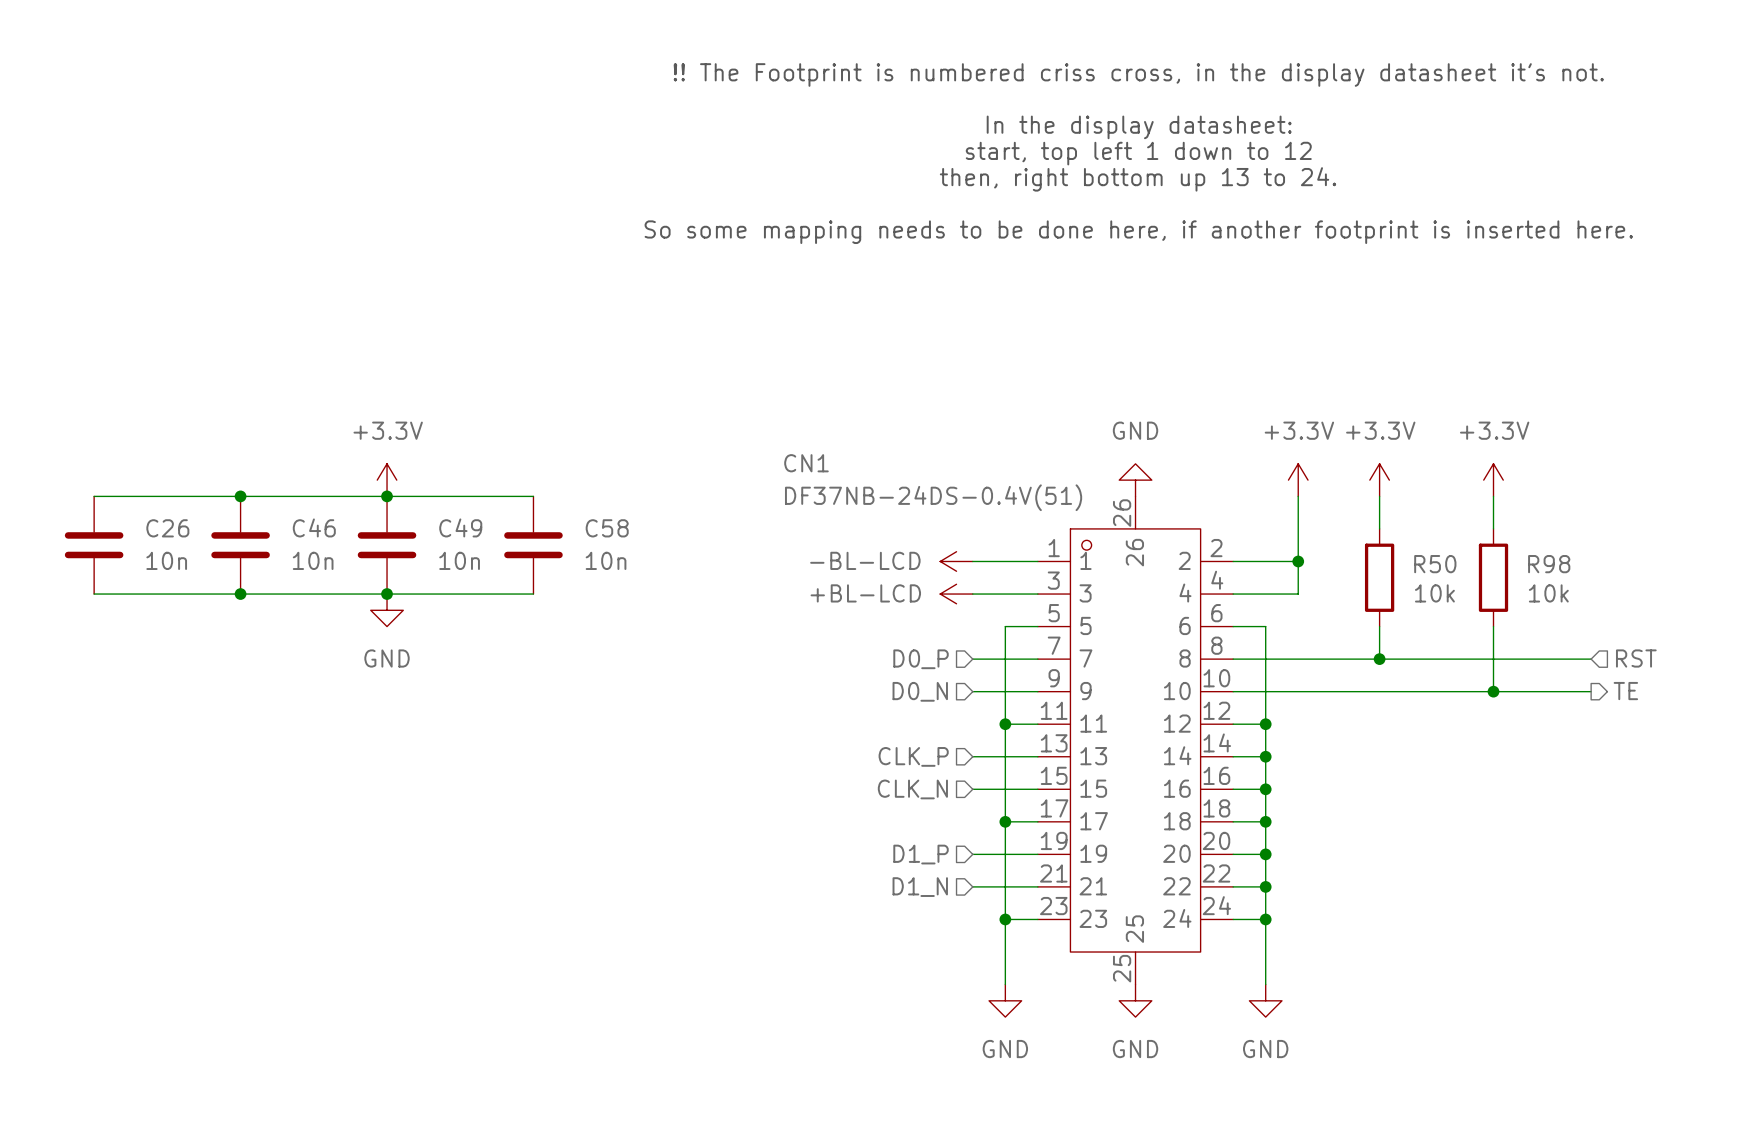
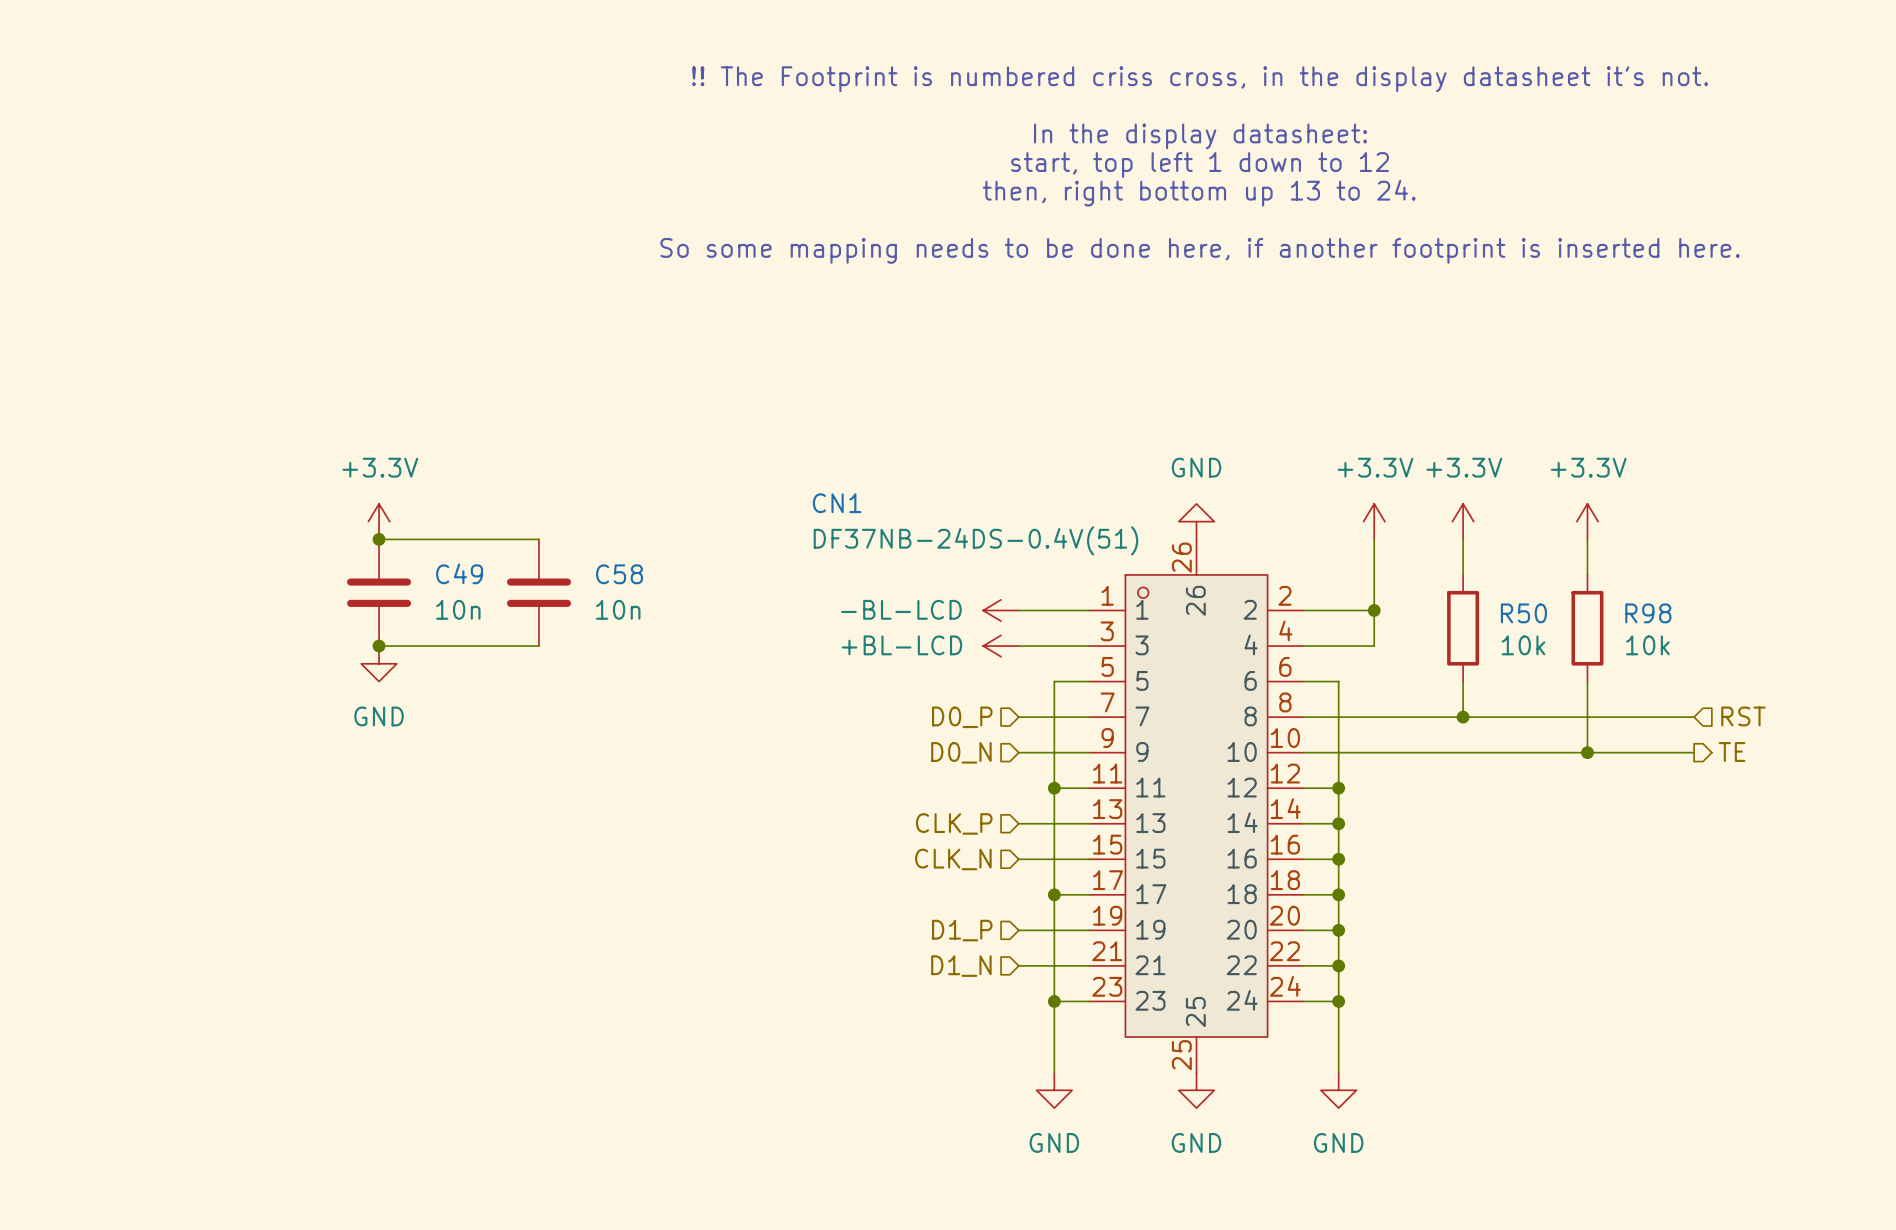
wire: (94, 496) (387, 496) -> none
junction: (240, 496) -> none
C26: 10n (94, 545) -> none
C46: 10n (240, 545) -> none
wire: (94, 594) (387, 594) -> none
junction: (240, 594) -> none

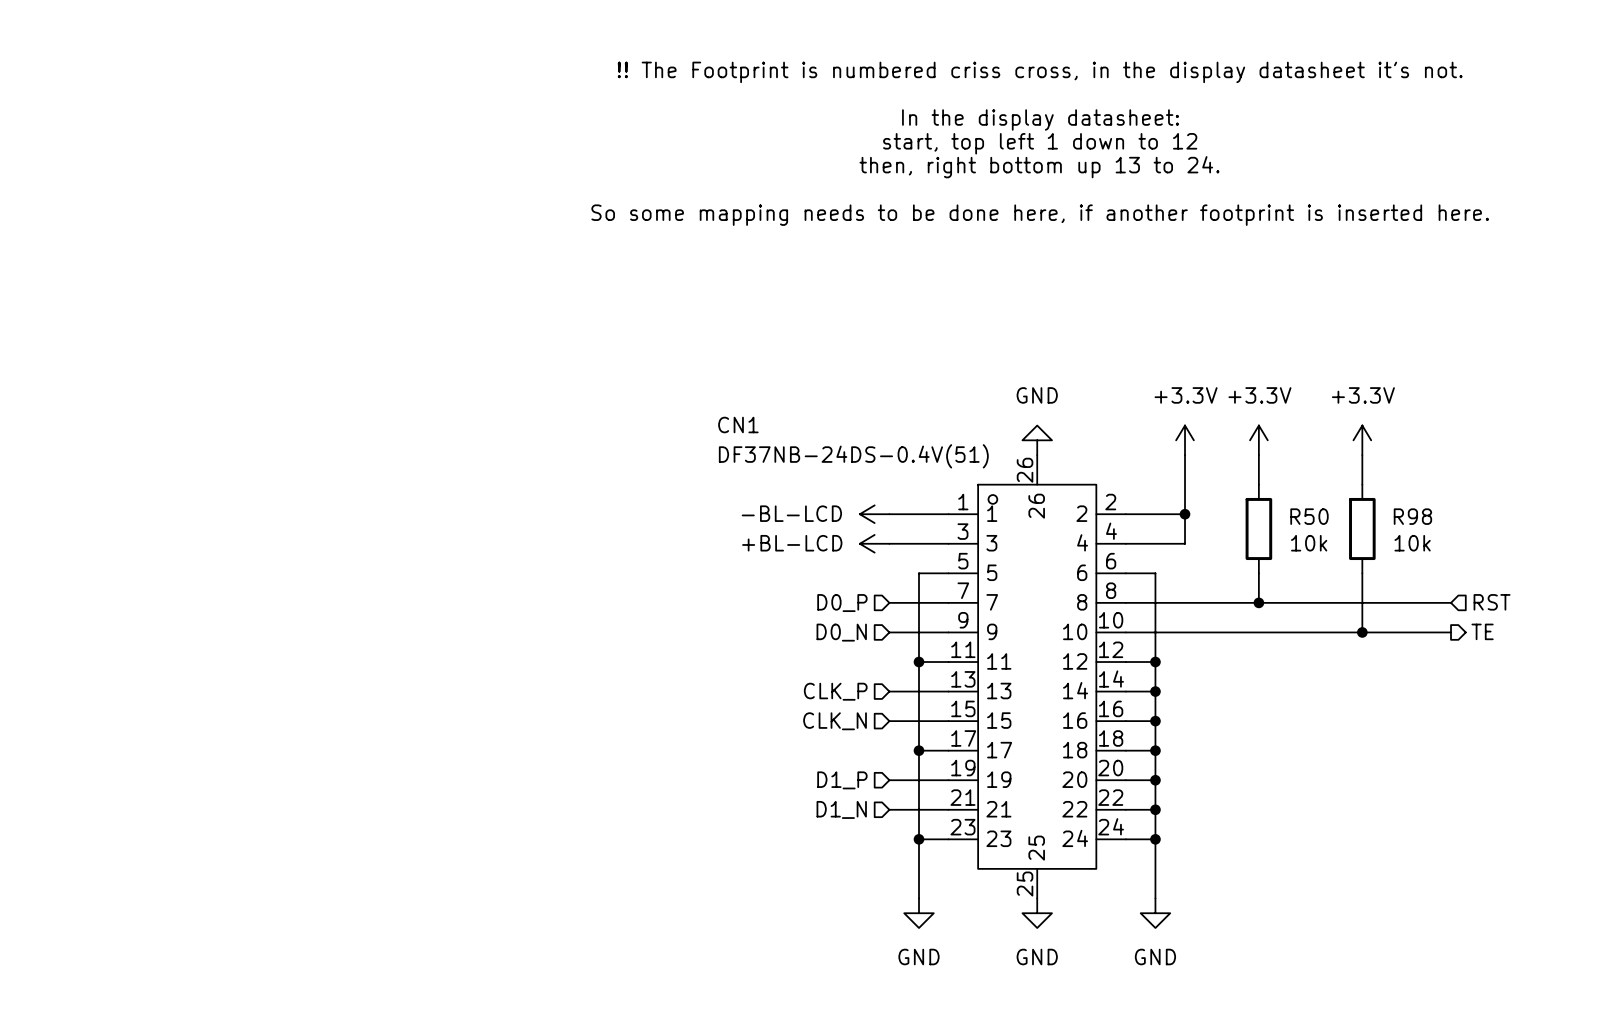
power symbol: +3.3V (379, 521) -> none
wire: (379, 539) (538, 539) -> none
junction: (379, 539) -> none
C49: 10n (379, 592) -> none
C58: 10n (538, 592) -> none
wire: (379, 646) (538, 646) -> none
junction: (379, 646) -> none
power symbol: GND (379, 663) -> none

